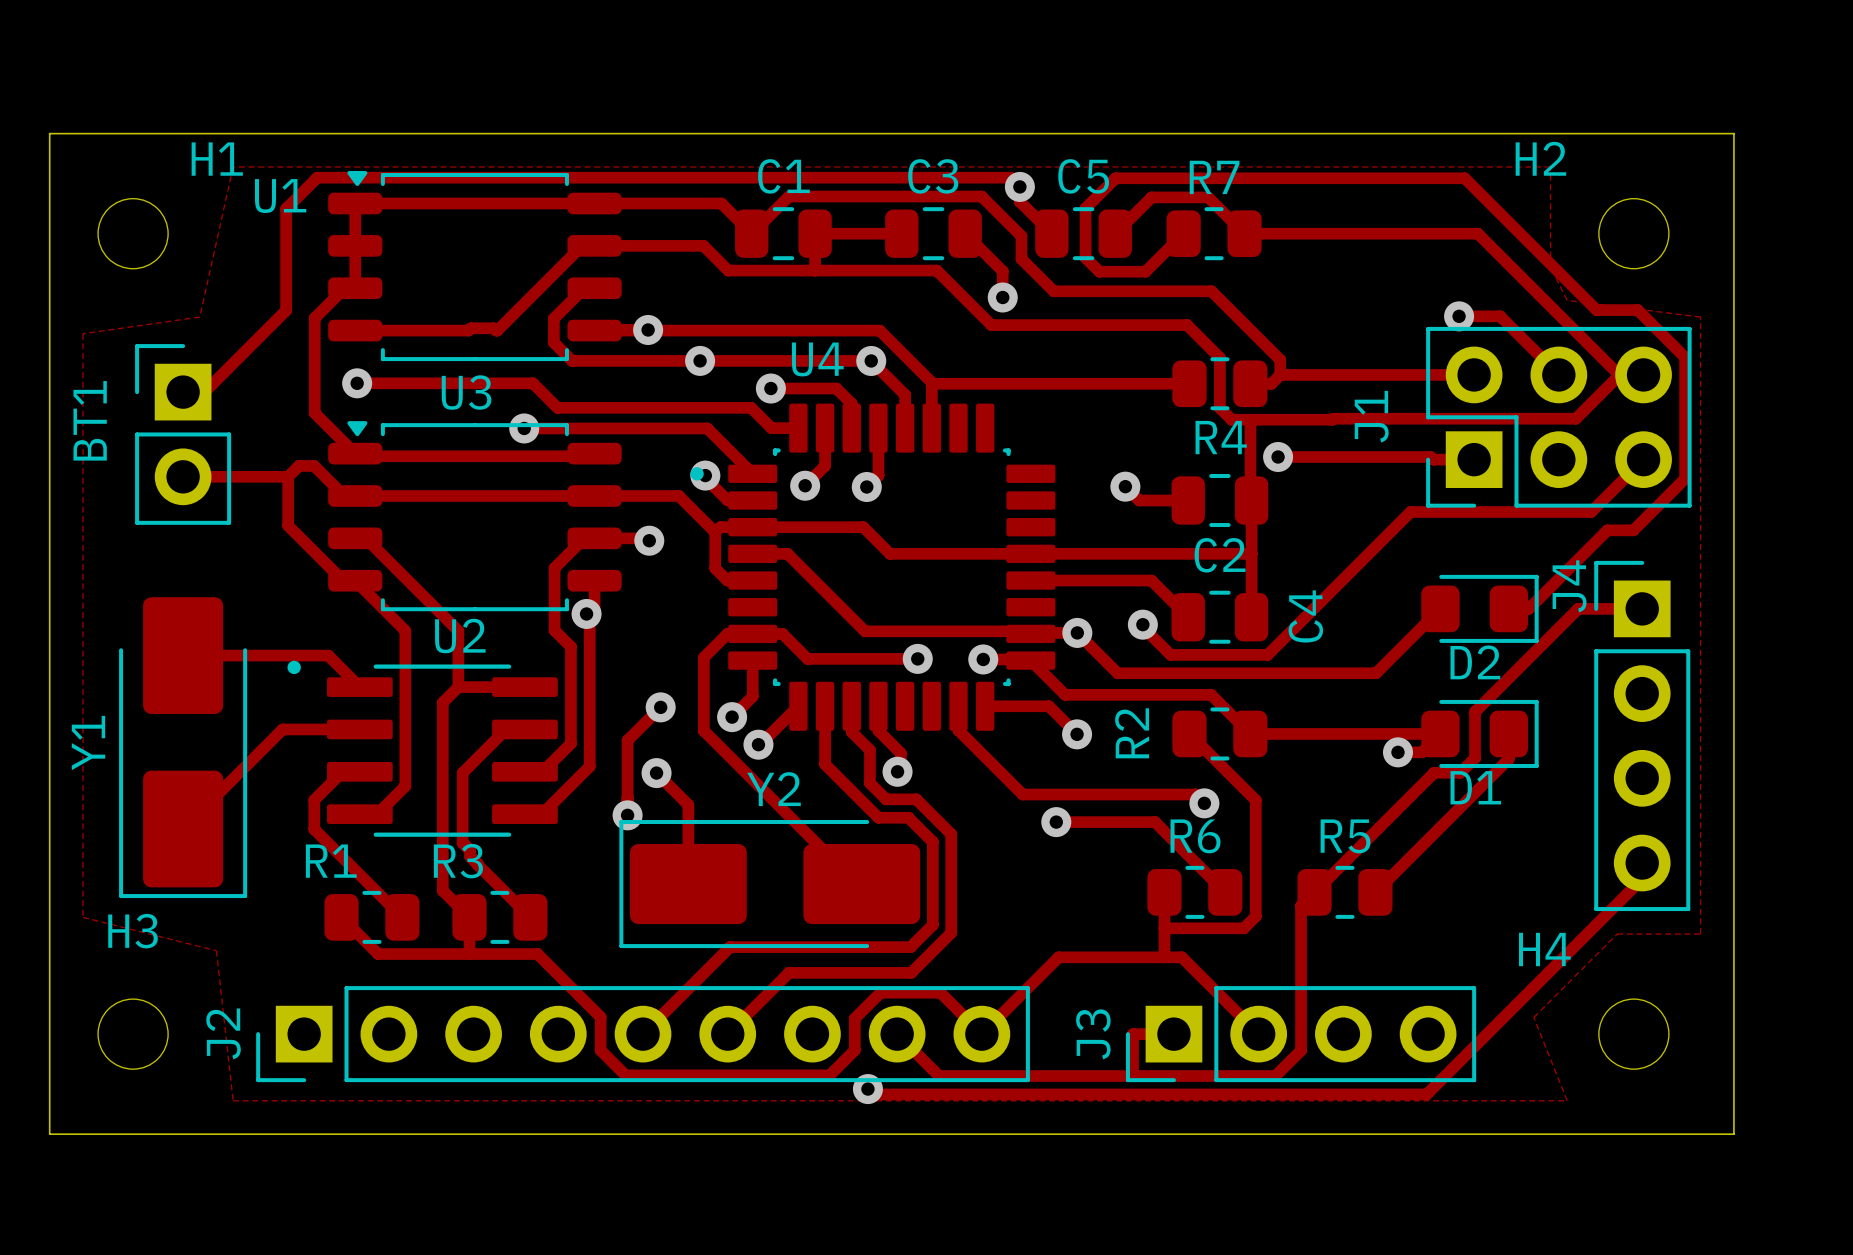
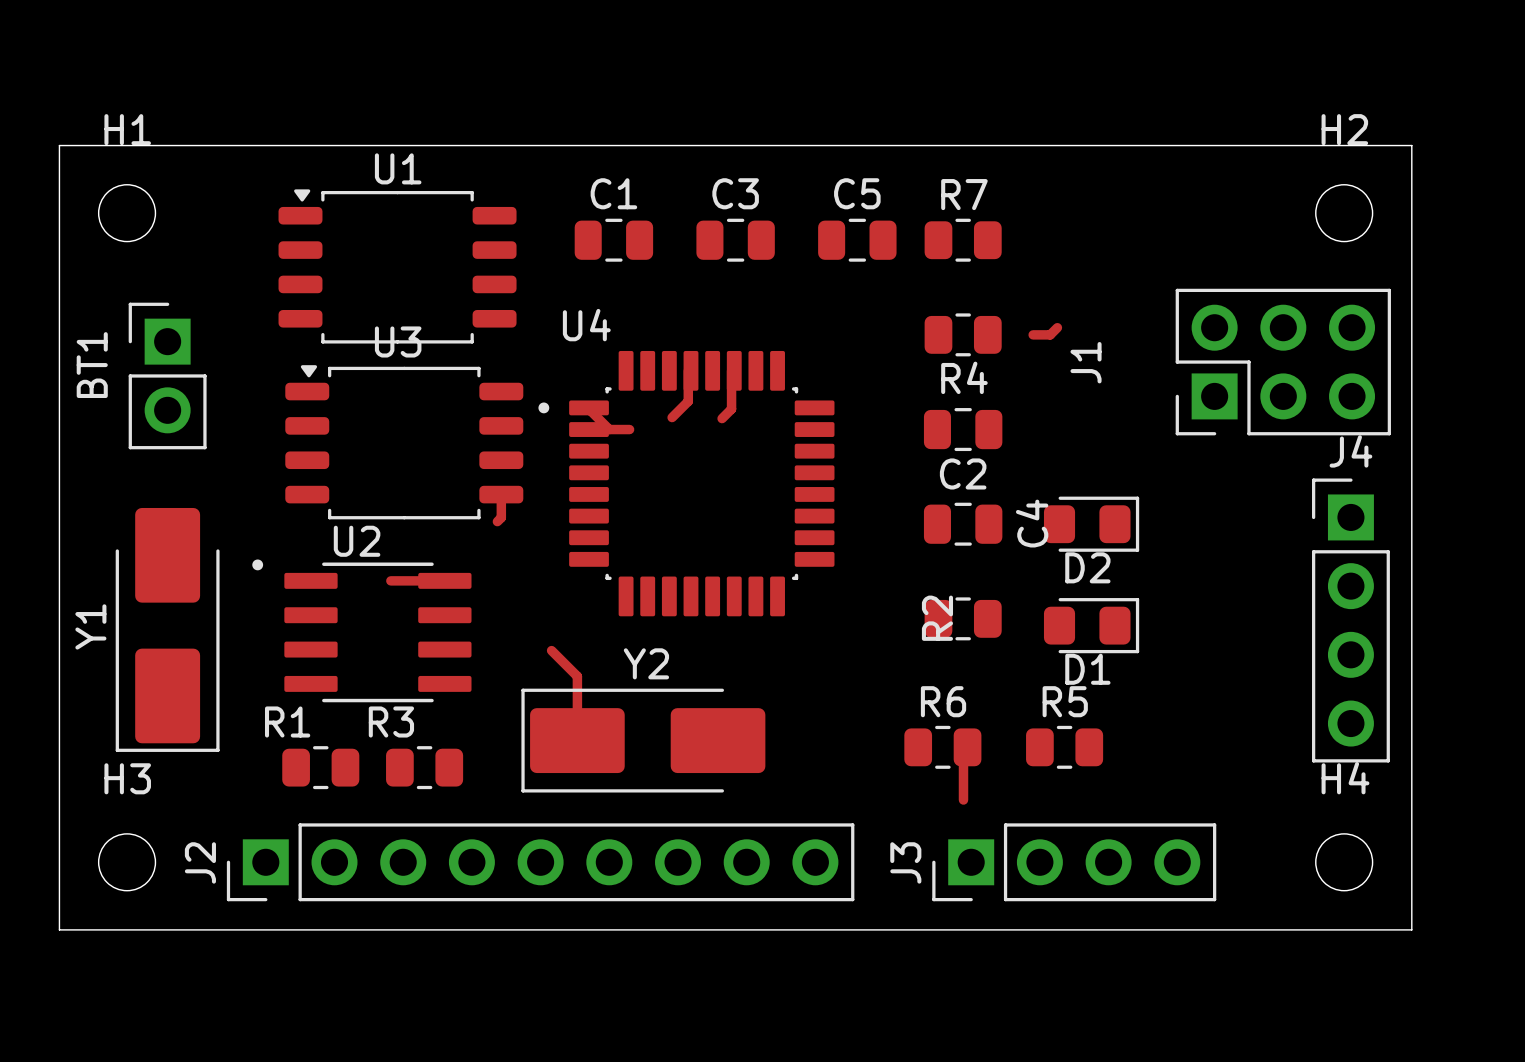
board edge: (49, 150) (49, 133) (1733, 133) (1733, 1134) (49, 1134) (49, 1117) -> (59, 145) (1411, 145) (1411, 929) (59, 929)
H2 name position: H2 (1540, 158) -> H2 (1344, 129)
H1 name position: H1 (217, 159) -> H1 (127, 129)
zone outline: (233, 166) (1550, 166) (1550, 267) (1567, 300) (1700, 317) (1700, 934) (1617, 934) (1533, 1017) (1567, 1100) (233, 1100) (216, 950) (83, 917) (83, 333) (199, 317) (233, 166) -> none
via: (1019, 186) -> none
U1 name position: U1 (280, 196) -> U1 (398, 168)
C1 position: (783, 233) -> (613, 240)
track: (901, 233) (815, 233) (815, 270) -> none
C3 position: (933, 233) -> (735, 240)
track: (965, 233) (1002, 271) (1002, 297) -> none
track: (1051, 233) (1019, 201) (1019, 186) (1010, 177) (317, 177) (286, 208) (286, 310) (204, 392) (183, 392) -> none
C5 position: (1083, 233) -> (857, 240)
track: (1115, 233) (1151, 197) (1208, 197) (1244, 233) (1477, 233) (1619, 375) -> none
track: (1183, 233) (1145, 271) (1099, 271) (1085, 257) (1085, 208) (1115, 178) (1464, 178) (1596, 310) (1637, 310) (1685, 357) (1685, 478) (1633, 530) (1607, 530) (1528, 608) (1508, 608) -> none
R7 position: (1214, 233) -> (963, 240)
U1 position: (474, 266) -> (397, 266)
track: (594, 288) (584, 288) (553, 318) (553, 342) (572, 360) (871, 360) (905, 394) (905, 428) -> none
via: (1002, 297) -> none
track: (1459, 316) (1500, 316) (1558, 374) -> none
via: (1459, 316) -> none
track: (648, 329) (594, 330) (879, 330) (931, 382) (931, 428) -> none
via: (648, 329) -> none
track: (355, 330) (468, 330) (470, 328) (493, 328) (497, 330) (582, 245) (703, 245) (728, 270) (936, 270) (991, 325) (1187, 325) (1219, 357) (1219, 408) (1231, 419) (1575, 418) (1631, 363) (1643, 374) -> none
U4 name position: U4 (817, 359) -> U4 (586, 325)
via: (700, 360) -> none
via: (871, 360) -> none
track: (1474, 374) (1280, 374) (1280, 359) (1211, 291) (1053, 291) (1021, 259) (1021, 236) (981, 196) (788, 196) (751, 233) (721, 203) (355, 203) (355, 288) (344, 288) (314, 318) (314, 413) (357, 456) (591, 456) (594, 453) -> none
track: (357, 383) (533, 383) (557, 407) (751, 407) (771, 428) (798, 428) -> none
via: (357, 383) -> none
track: (931, 383) (1189, 383) -> none
R4 position: (1219, 383) -> (963, 334)
track: (770, 388) (836, 388) (851, 403) (851, 428) -> none
via: (770, 388) -> none
J1 name position: J1 (1371, 416) -> J1 (1086, 362)
track: (1250, 419) (1251, 617) -> none
track: (524, 428) (707, 428) (752, 473) -> none
via: (524, 428) -> none
track: (1278, 456) (1430, 456) (1433, 459) (1474, 459) -> none
via: (1278, 456) -> none
track: (1643, 459) (1591, 512) (1410, 512) (1267, 654) (1170, 654) (1142, 627) (1142, 624) -> none
via: (705, 475) -> none
track: (183, 476) (288, 476) -> none
track: (288, 476) (288, 525) (343, 580) (355, 580) (405, 630) (405, 786) (377, 814) (359, 814) -> none
track: (288, 476) (298, 465) (314, 465) (344, 496) (678, 496) (715, 532) -> none
via: (805, 485) -> none
via: (866, 486) -> none
track: (1125, 486) (1139, 500) (1188, 500) -> none
via: (1125, 486) -> none
C2 position: (1219, 500) -> (963, 429)
track: (715, 532) (715, 568) (727, 580) (752, 580) -> none
track: (715, 532) (720, 527) (863, 527) (890, 553) (1251, 553) -> none
track: (355, 538) (365, 538) (458, 630) (458, 687) (442, 702) (442, 890) (469, 917) (469, 954) -> none
track: (649, 540) (646, 538) (584, 538) (554, 568) (554, 630) (570, 646) (570, 743) (542, 771) (524, 771) -> none
via: (649, 540) -> none
track: (752, 553) (787, 553) (865, 631) (1077, 632) (1117, 673) (1376, 673) (1440, 608) -> none
U4 position: (872, 567) -> (686, 483)
track: (1030, 580) (1151, 580) (1188, 617) -> none
J4 name rotation: 0° (1569, 586) -> 90° clockwise (1350, 451)
J4 name position: J4 (1569, 586) -> J4 (1350, 451)
D2 position: (1479, 608) -> (1091, 524)
track: (1642, 608) (1578, 608) (1475, 712) (1475, 758) (1460, 772) (1434, 772) (1301, 905) (1301, 1050) (1275, 1076) (939, 1076) (897, 1034) -> none
via: (586, 613) -> none
track: (586, 614) (589, 614) (589, 766) (542, 814) (524, 814) -> none
C4 position: (1219, 617) -> (963, 524)
via: (1142, 624) -> none
via: (1077, 632) -> none
U2 name position: U2 (460, 635) -> U2 (357, 541)
track: (183, 655) (328, 655) (359, 687) -> none
track: (917, 658) (807, 658) (782, 633) (727, 633) (703, 657) (703, 730) (857, 884) (861, 884) -> none
via: (917, 658) -> none
track: (983, 659) (1029, 659) (1065, 694) (1211, 694) (1250, 733) (1440, 733) (1422, 752) (1397, 752) -> none
via: (983, 659) -> none
track: (752, 660) (752, 696) (732, 717) -> none
track: (798, 706) (758, 744) -> none
track: (825, 706) (825, 764) (878, 817) (908, 817) (932, 841) (932, 924) (910, 947) (730, 947) (643, 1034) -> none
track: (851, 706) (851, 732) (869, 750) (869, 783) (886, 799) (916, 799) (951, 834) (951, 932) (911, 972) (789, 972) (727, 1034) -> none
track: (878, 706) (878, 730) (900, 753) (900, 768) (897, 771) -> none
track: (958, 706) (958, 730) (1022, 794) (1195, 794) (1204, 803) -> none
track: (985, 706) (1048, 706) (1077, 734) -> none
track: (660, 707) (627, 740) (627, 815) -> none
via: (660, 707) -> none
via: (732, 717) -> none
track: (359, 729) (282, 729) (183, 829) -> none
track: (524, 729) (506, 729) (462, 772) (462, 842) (470, 850) (470, 856) (477, 864) -> none
track: (1189, 733) (1255, 800) (1255, 916) (1243, 928) (1164, 928) -> none
R2 position: (1219, 733) -> (963, 618)
D1 position: (1479, 733) -> (1091, 625)
track: (1508, 733) (1508, 758) (1375, 892) -> none
via: (1077, 734) -> none
via: (758, 744) -> none
via: (1397, 752) -> none
track: (359, 771) (342, 771) (314, 800) (314, 829) (402, 917) -> none
via: (897, 771) -> none
via: (656, 773) -> none
via: (1204, 803) -> none
via: (627, 815) -> none
track: (1056, 822) (1155, 822) (1225, 892) -> none
via: (1056, 822) -> none
track: (1642, 863) (1642, 878) (1426, 1094) (873, 1094) (867, 1089) -> none
track: (477, 864) (530, 917) -> none
R6 position: (1194, 892) -> (942, 747)
R5 position: (1344, 892) -> (1064, 747)
track: (341, 917) (378, 954) (537, 954) (600, 1017) (600, 1050) (625, 1075) (829, 1075) (854, 1050) (854, 1018) (880, 992) (940, 992) (981, 1034) (1058, 957) (1181, 957) (1258, 1034) -> none
H4 name position: H4 (1544, 949) -> H4 (1345, 778)
track: (1173, 1034) (1133, 1034) (1133, 1076) -> none
via: (867, 1089) -> none

